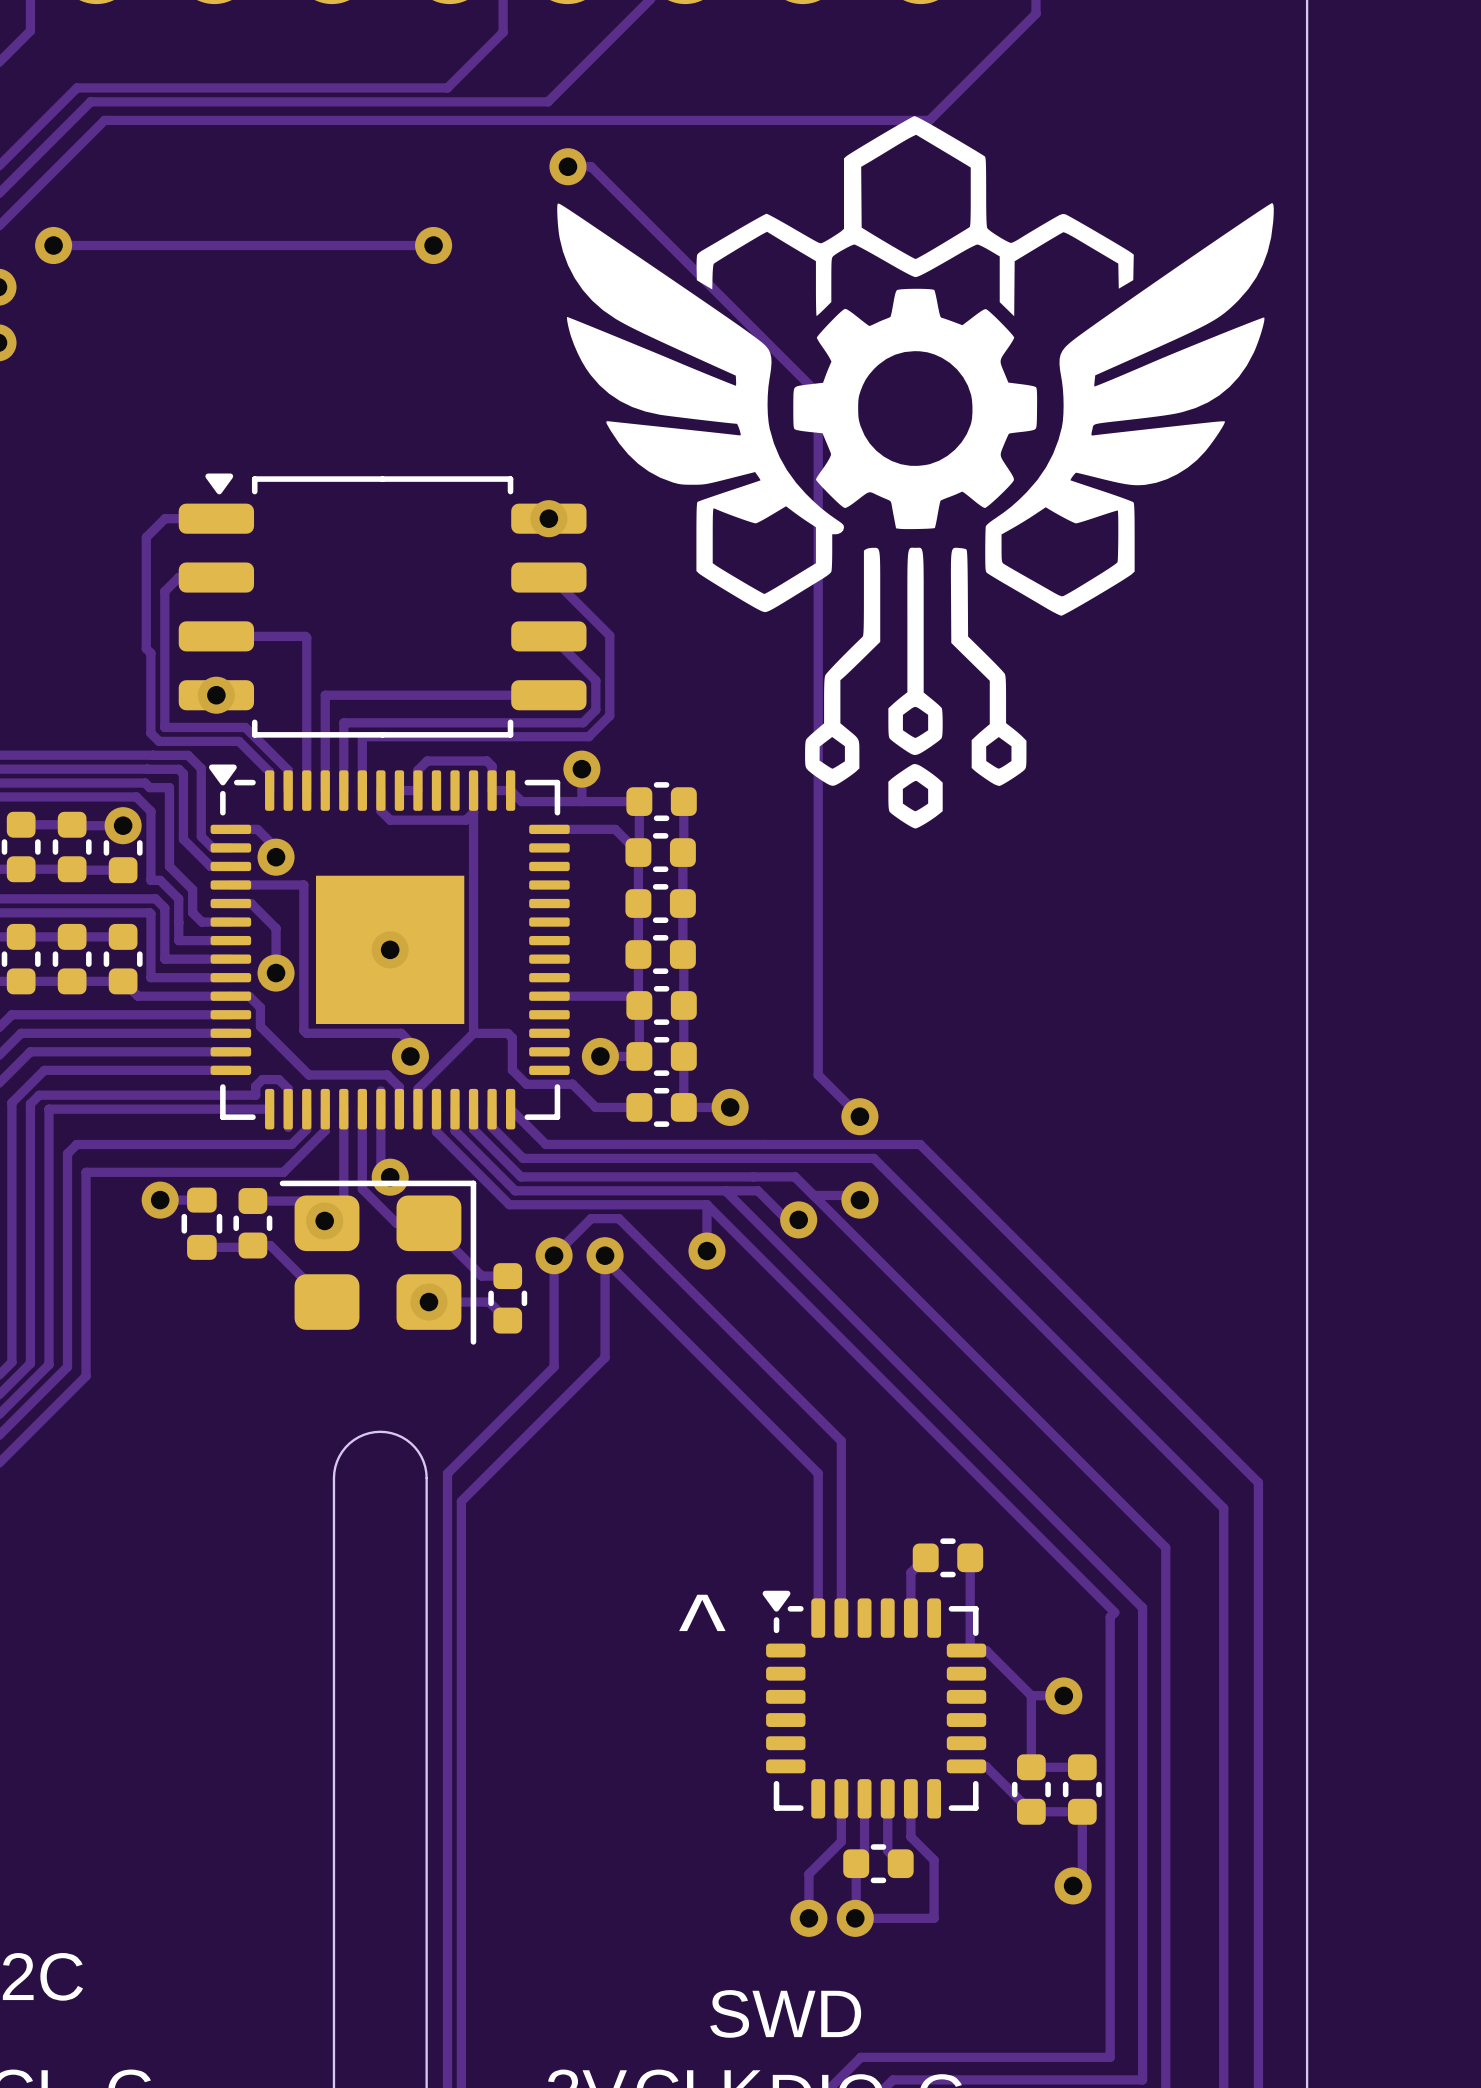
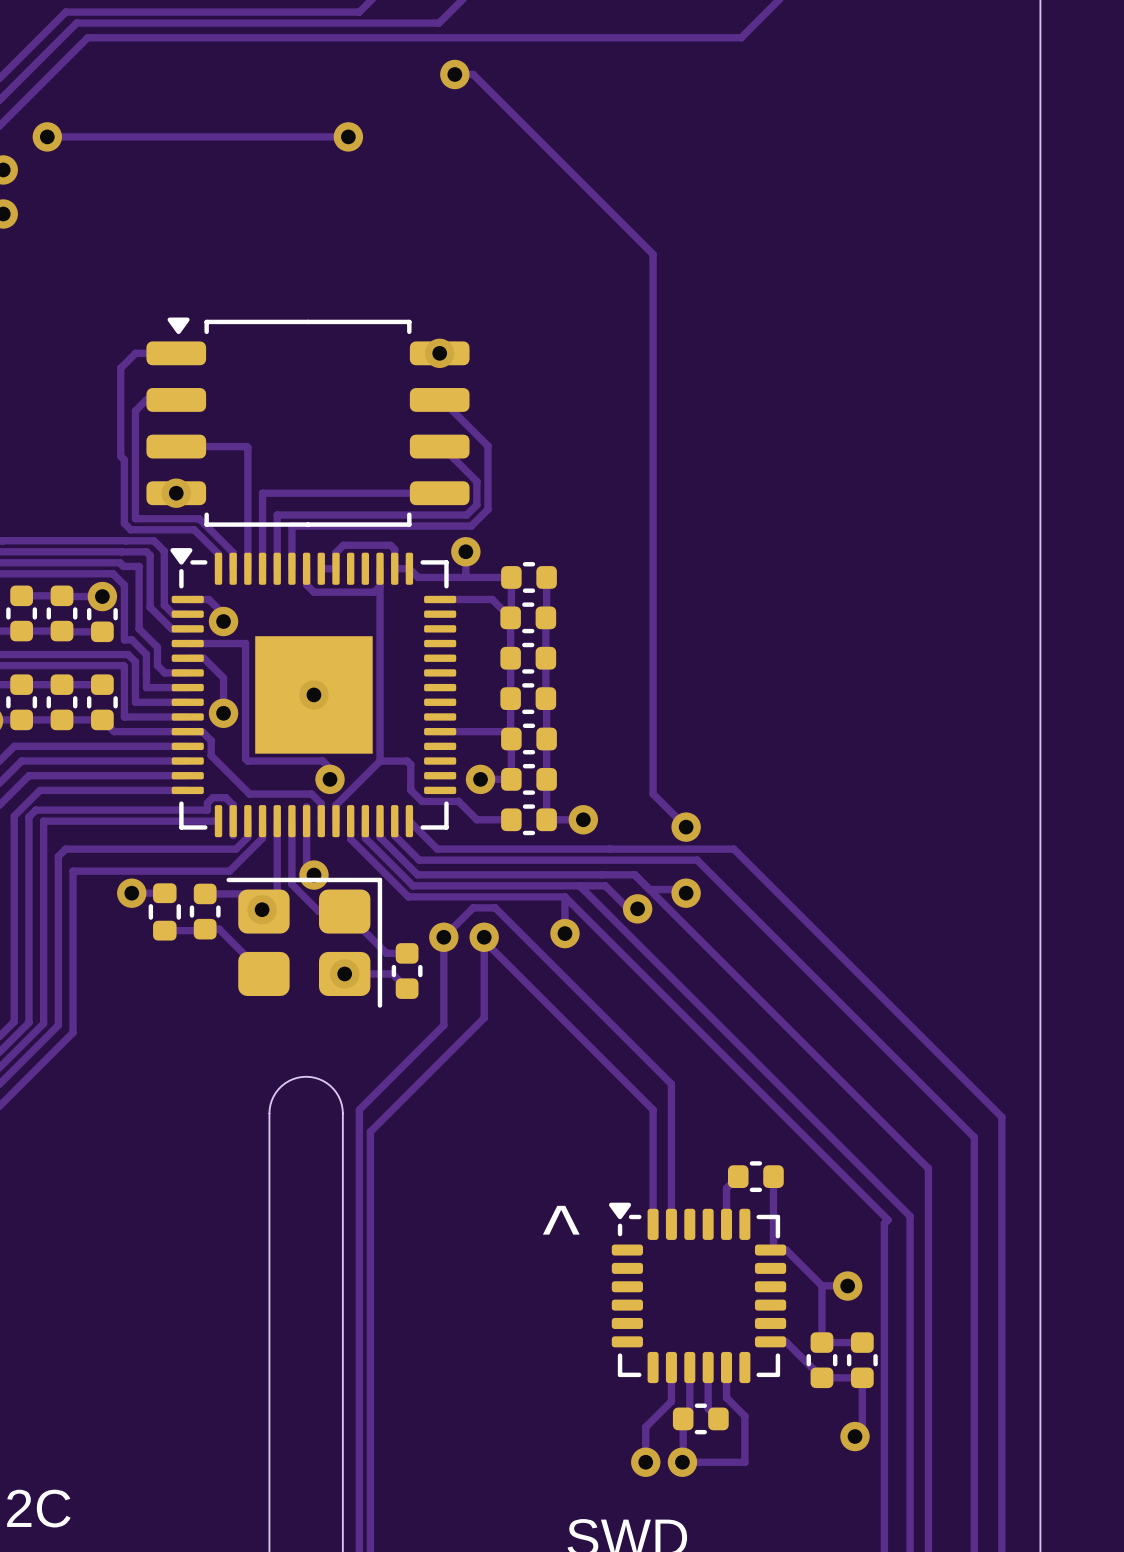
drawing: [557, 116, 1274, 829] -> none

